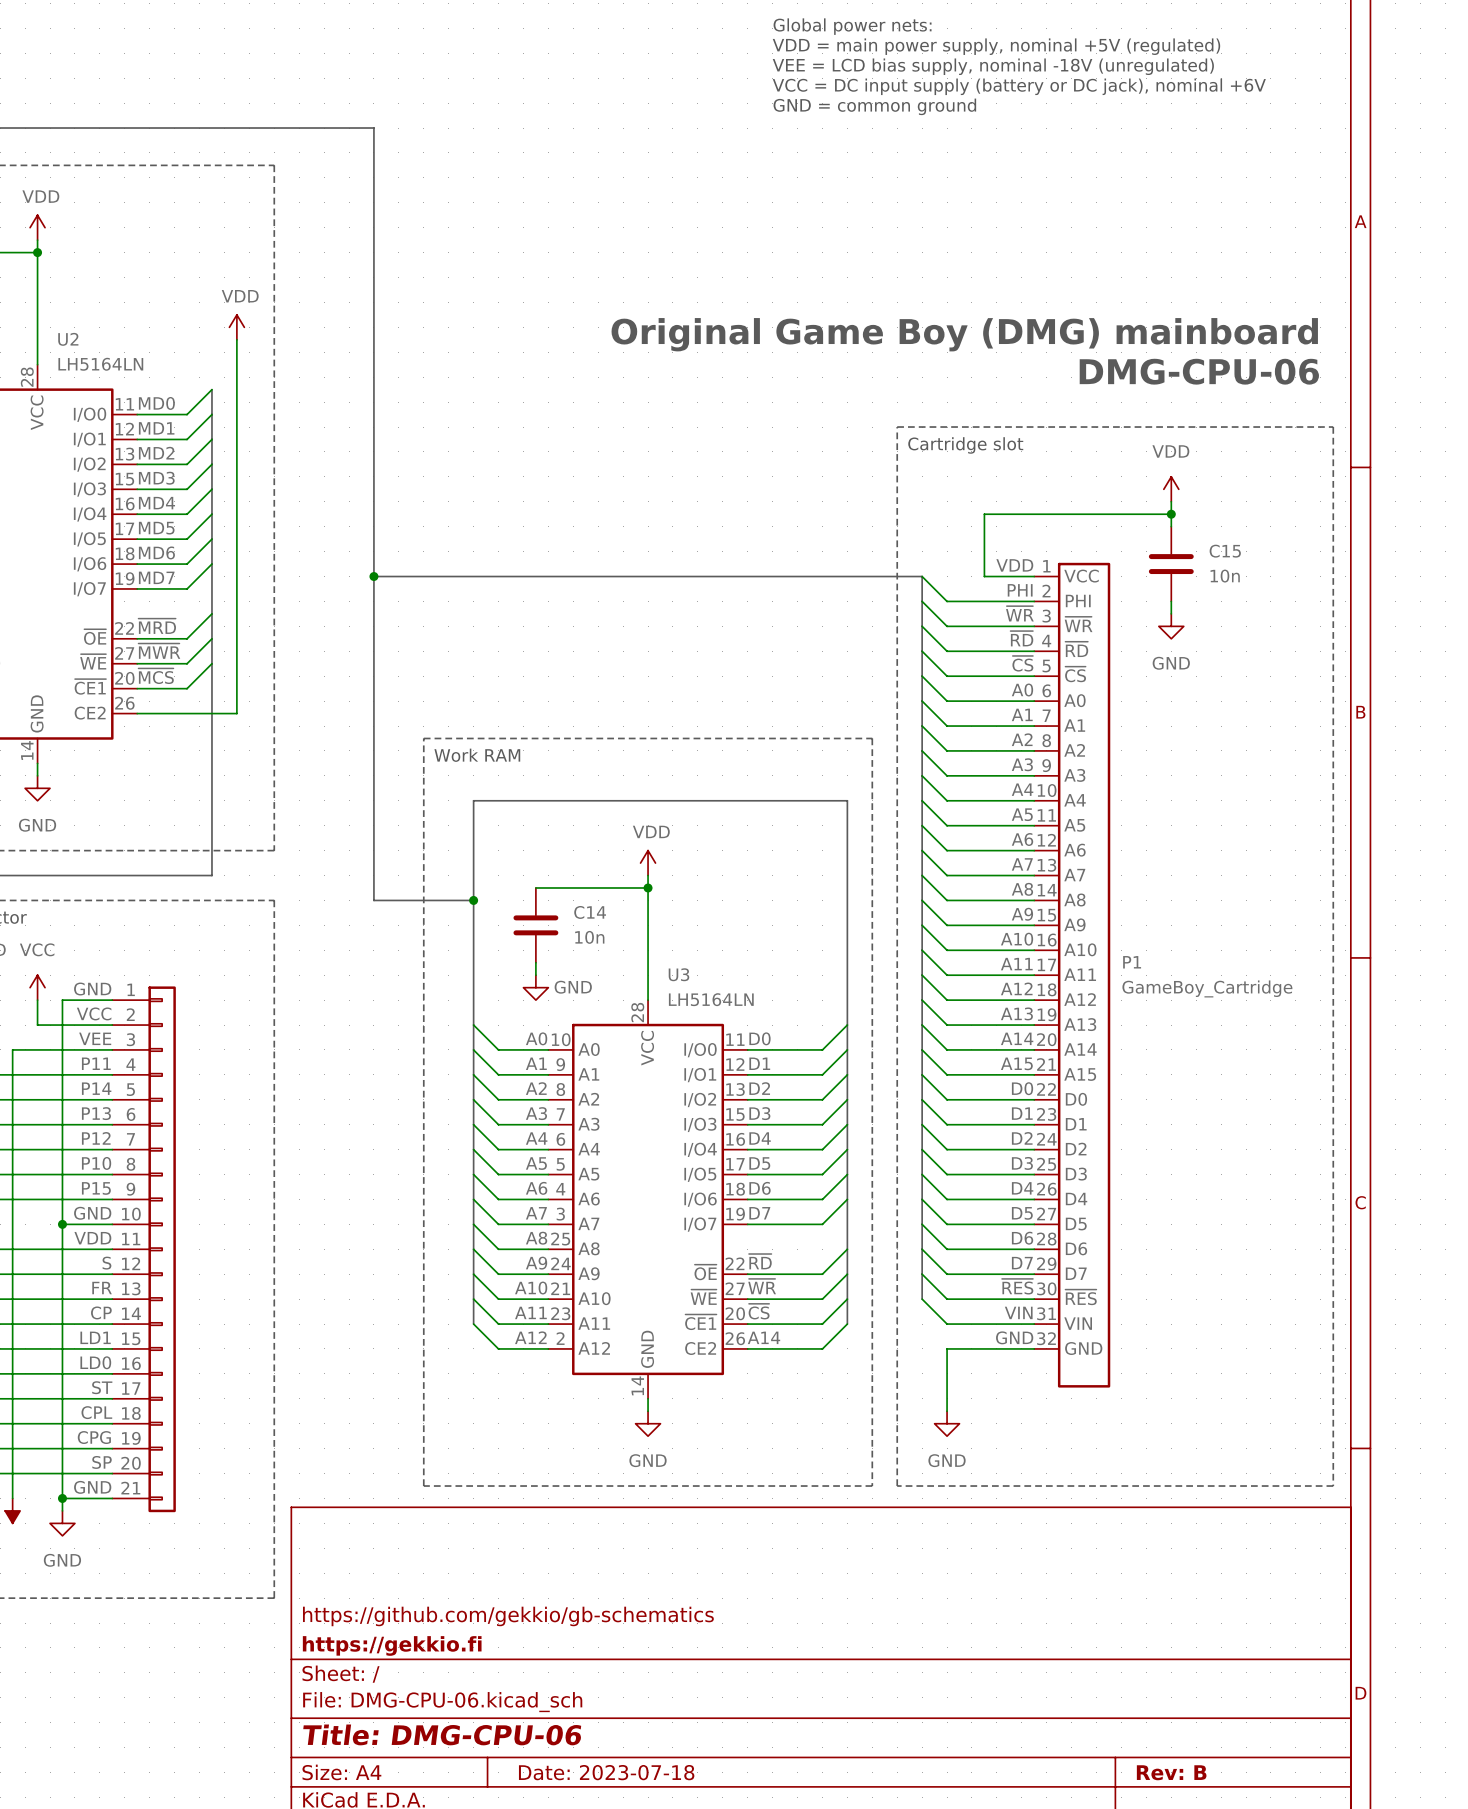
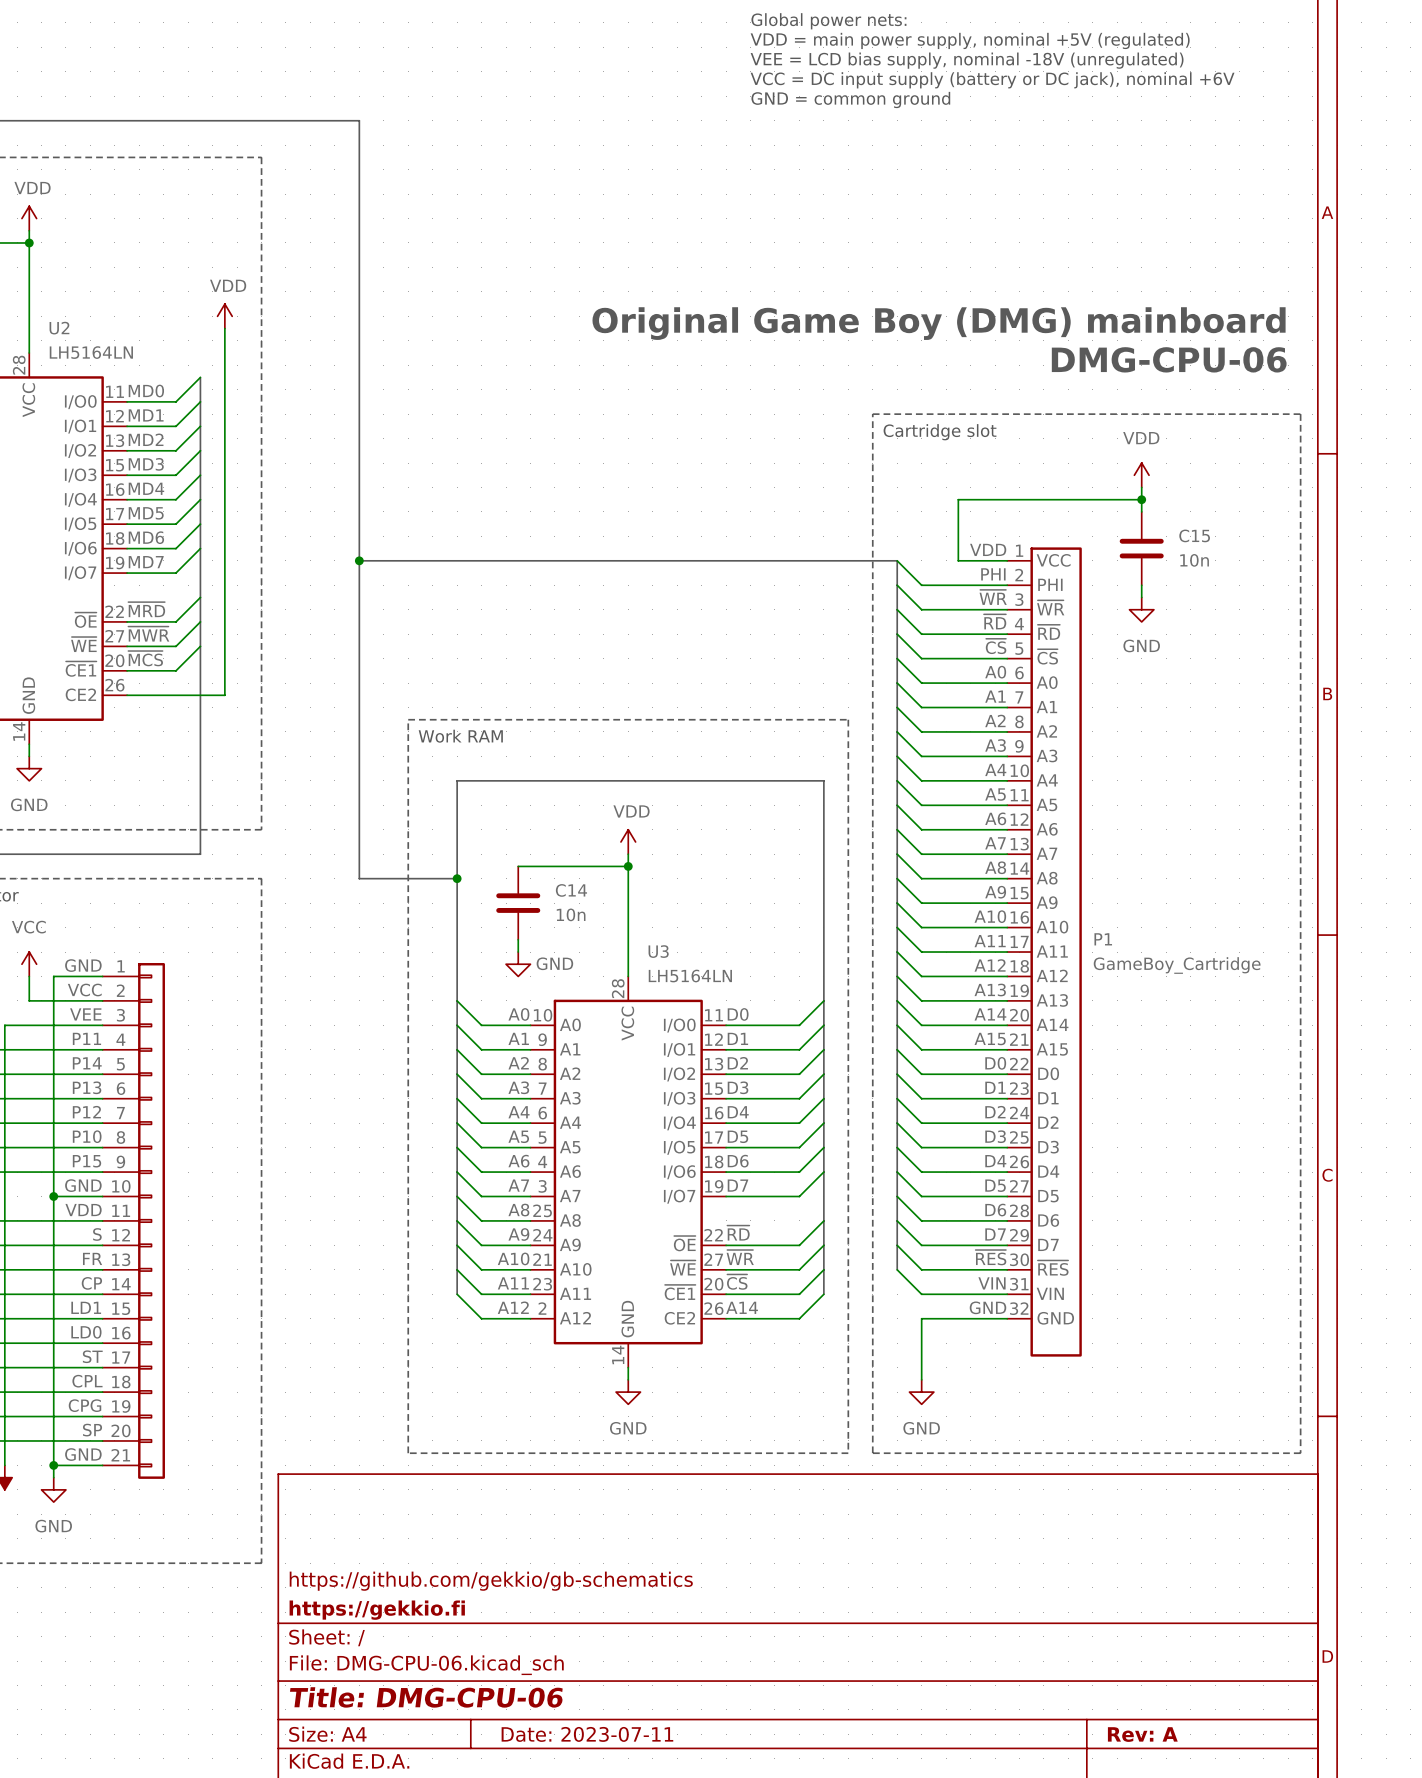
title block: Date: 2023-07-18 (606, 1772) -> Date: 2023-07-11 (587, 1734)
title block: Rev: B (1171, 1772) -> Rev: A (1142, 1734)

